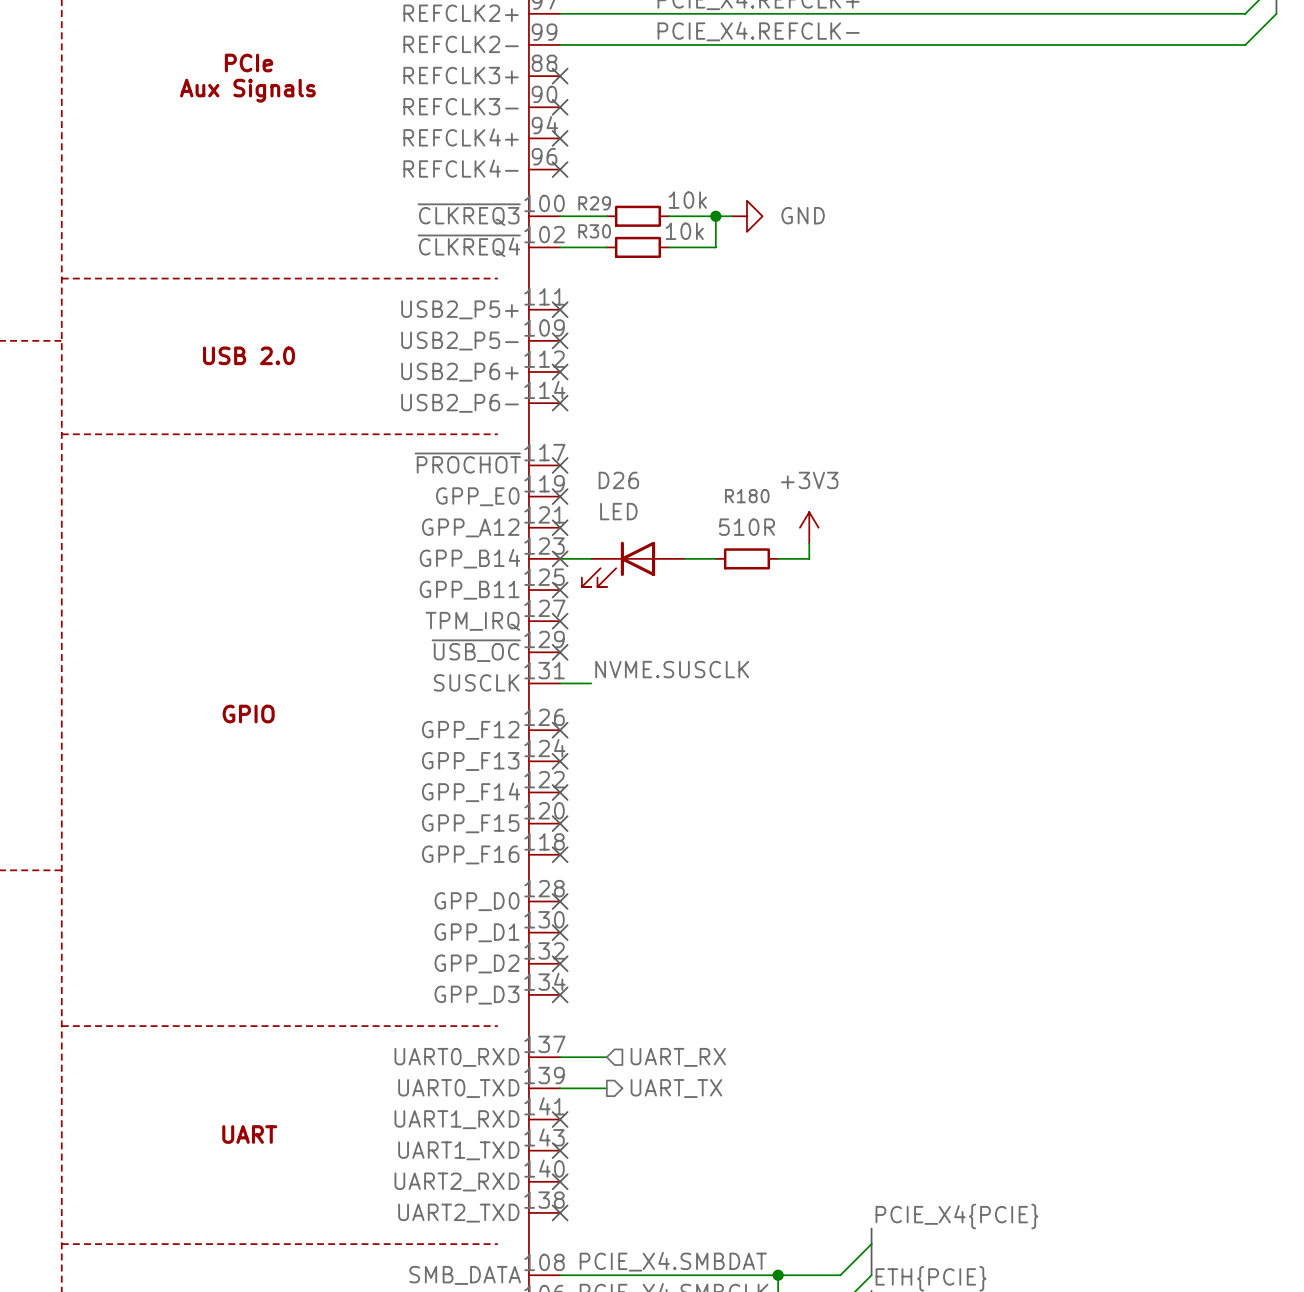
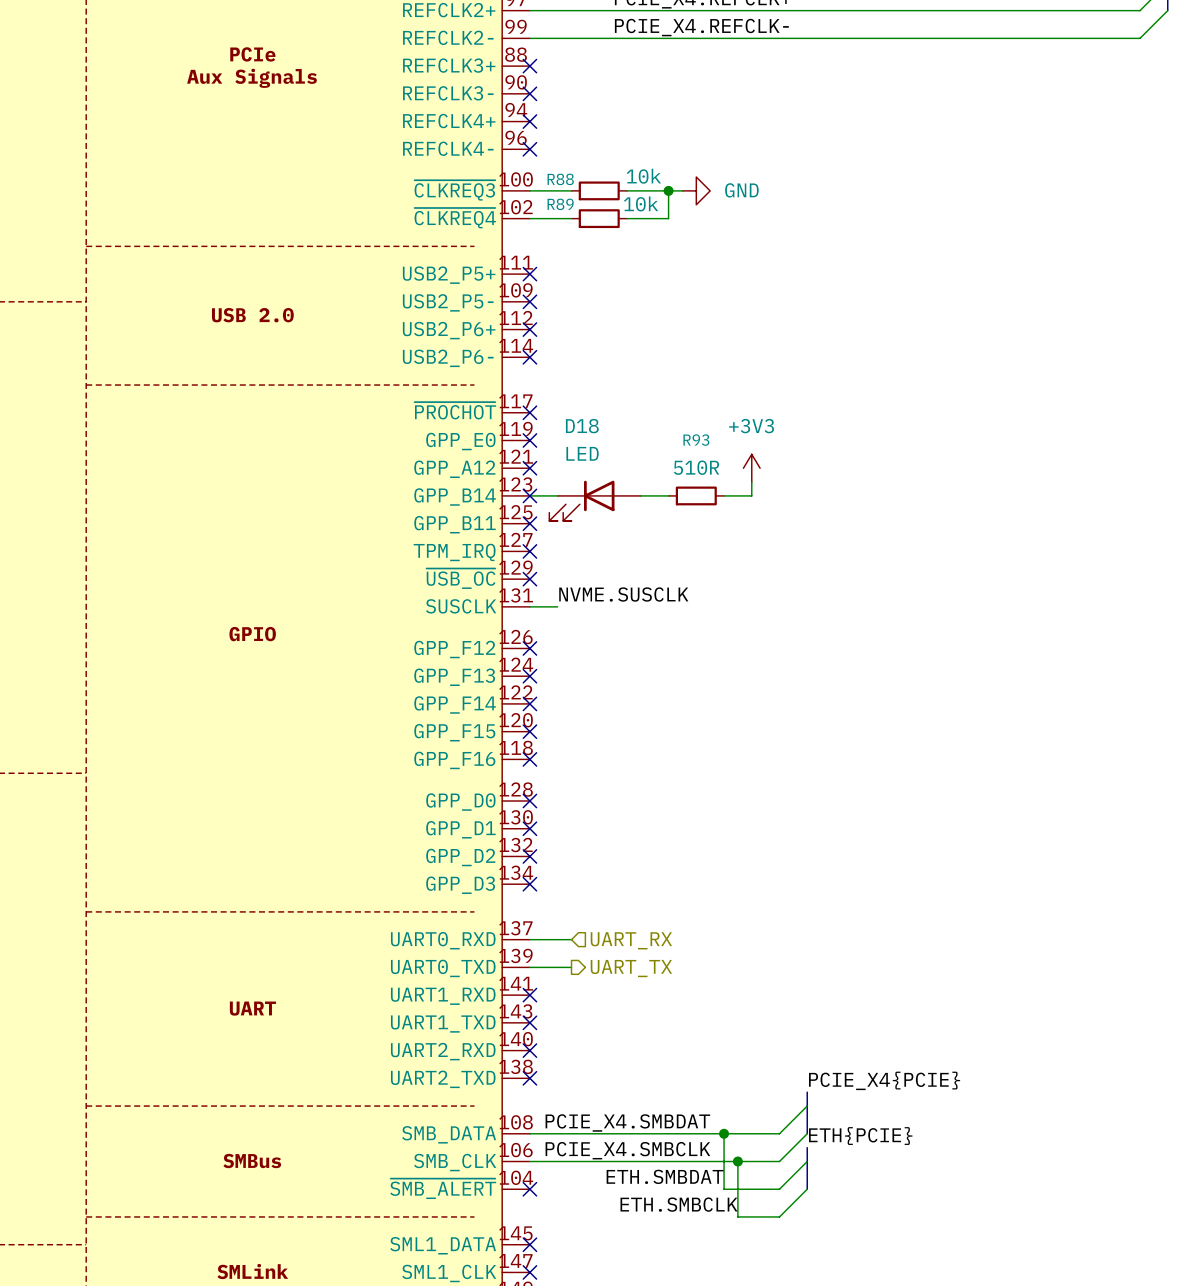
R29 name: R29 (594, 203) -> R88 (560, 179)
R30 name: R30 (594, 231) -> R89 (560, 204)
D26 name: D26 (618, 480) -> D18 (582, 426)
R180 name: R180 (747, 496) -> R93 (696, 440)

